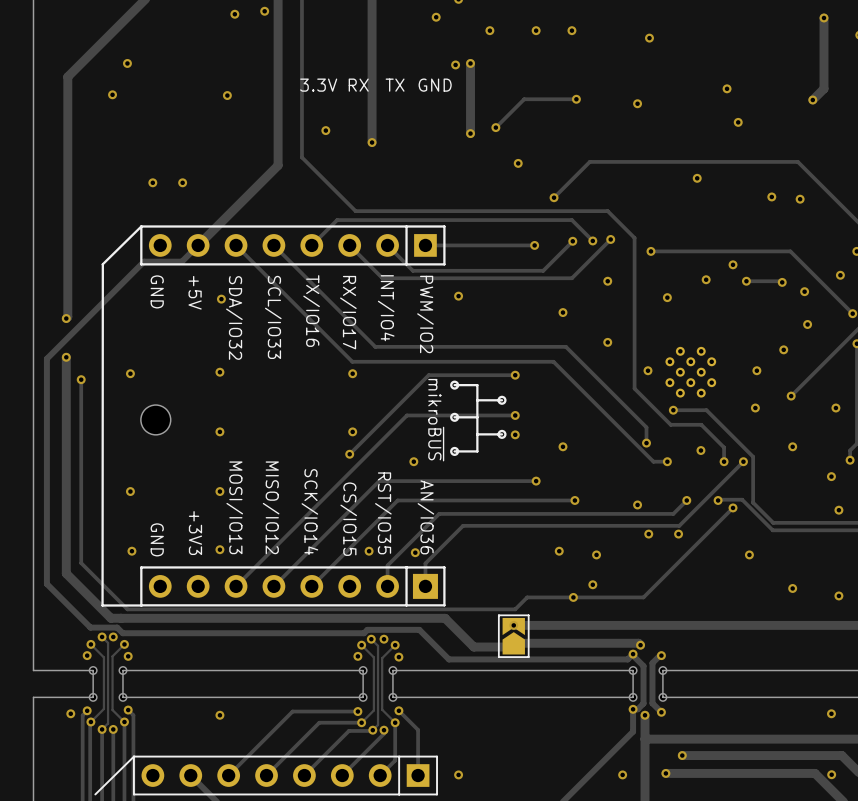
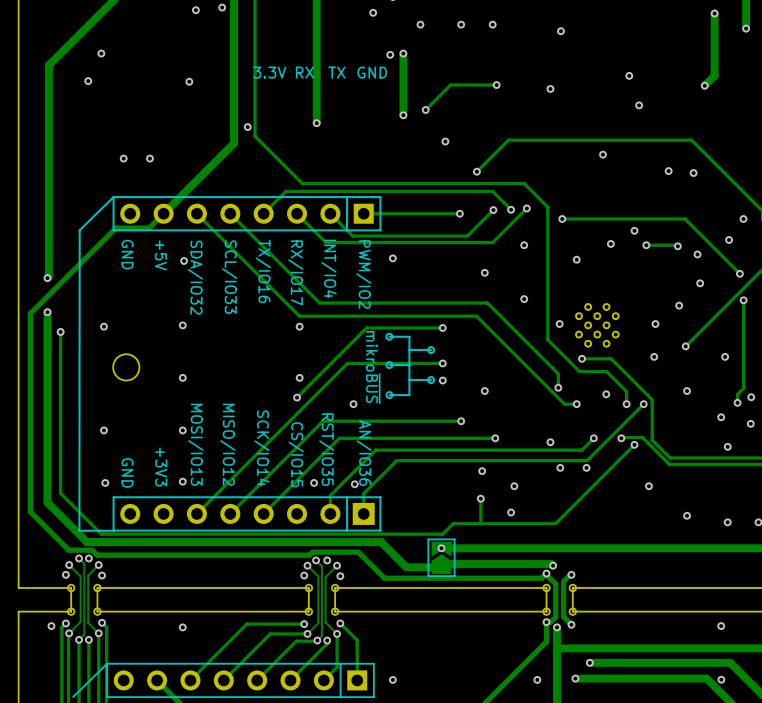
via position: (325, 130) -> (247, 127)
via: none -> (482, 471)
via: (559, 551) -> none
track: none -> (480, 498) (480, 523)
via: none -> (480, 498)
via: (573, 597) -> none

